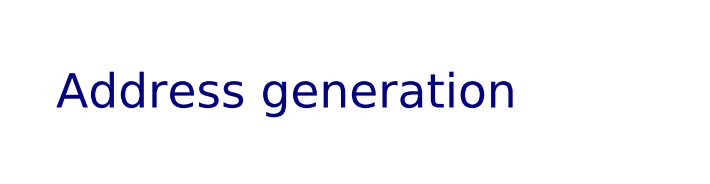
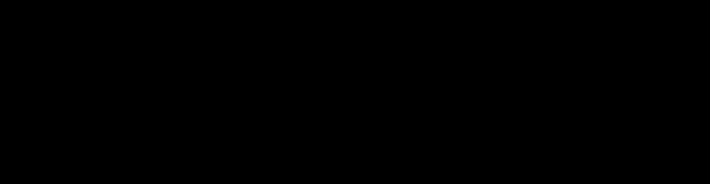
text: Address generation (284, 94) -> none

